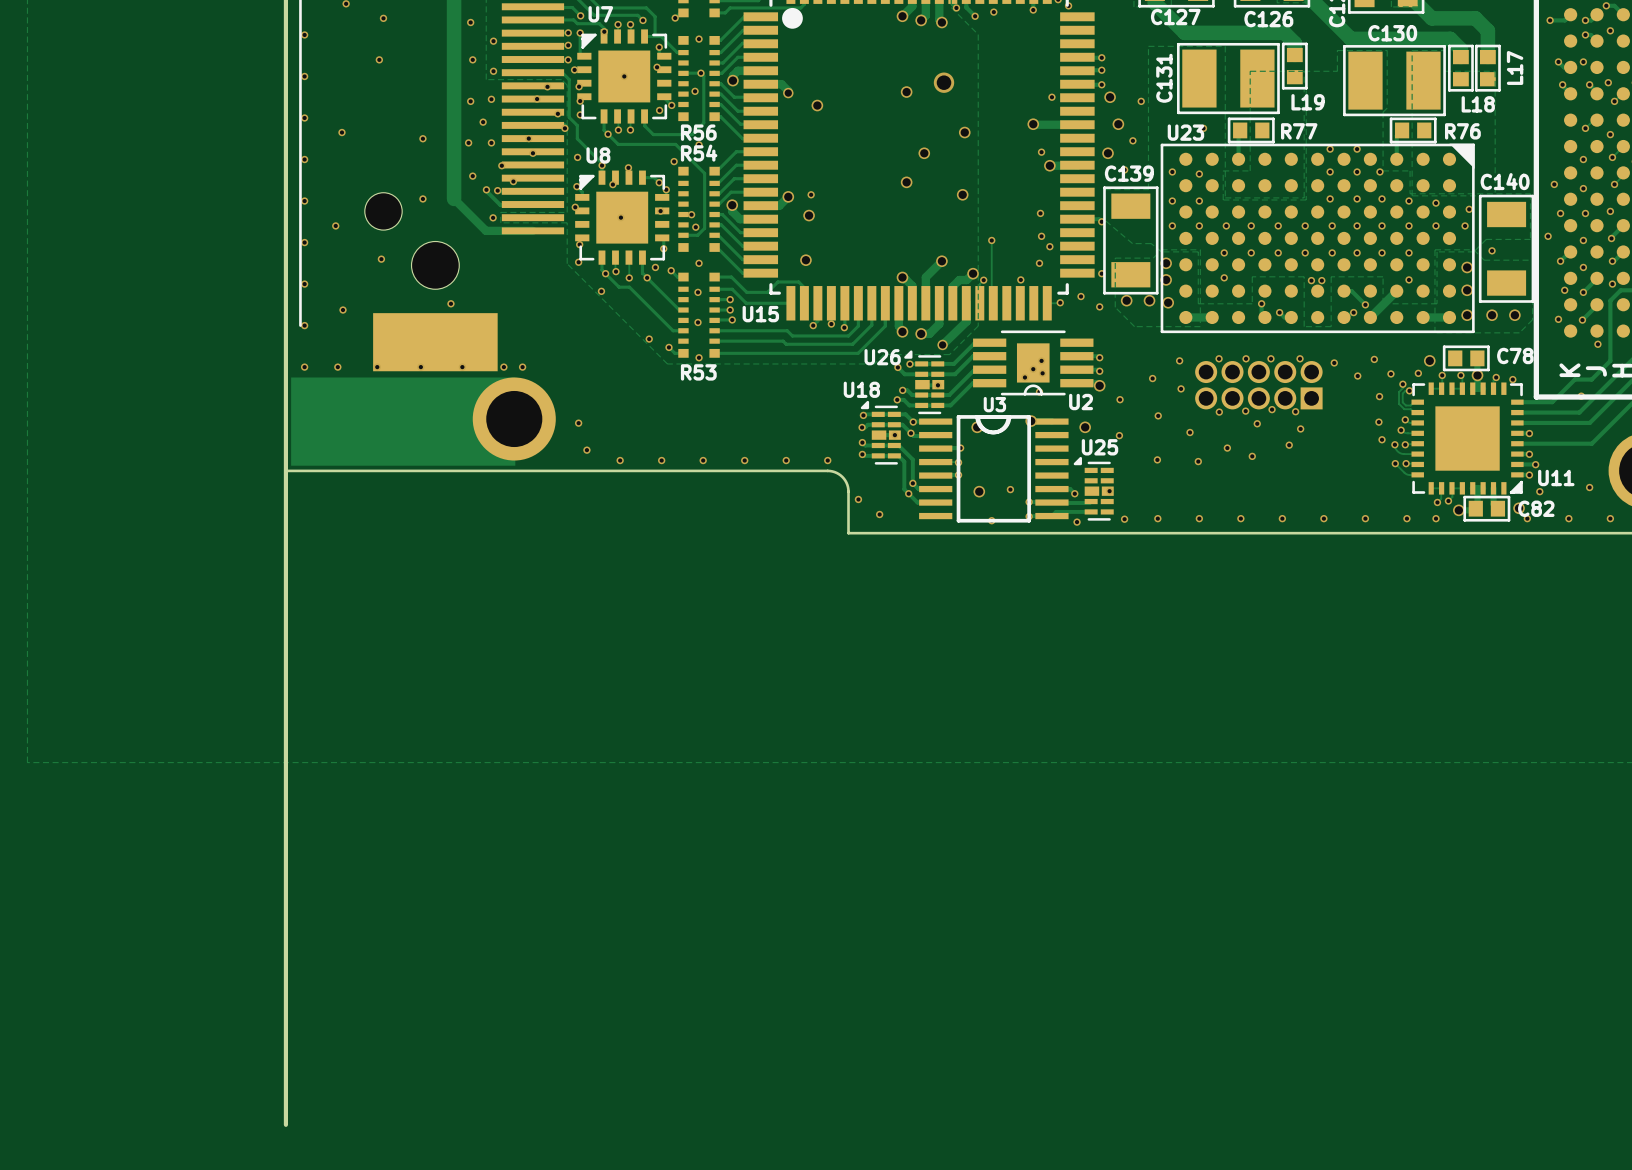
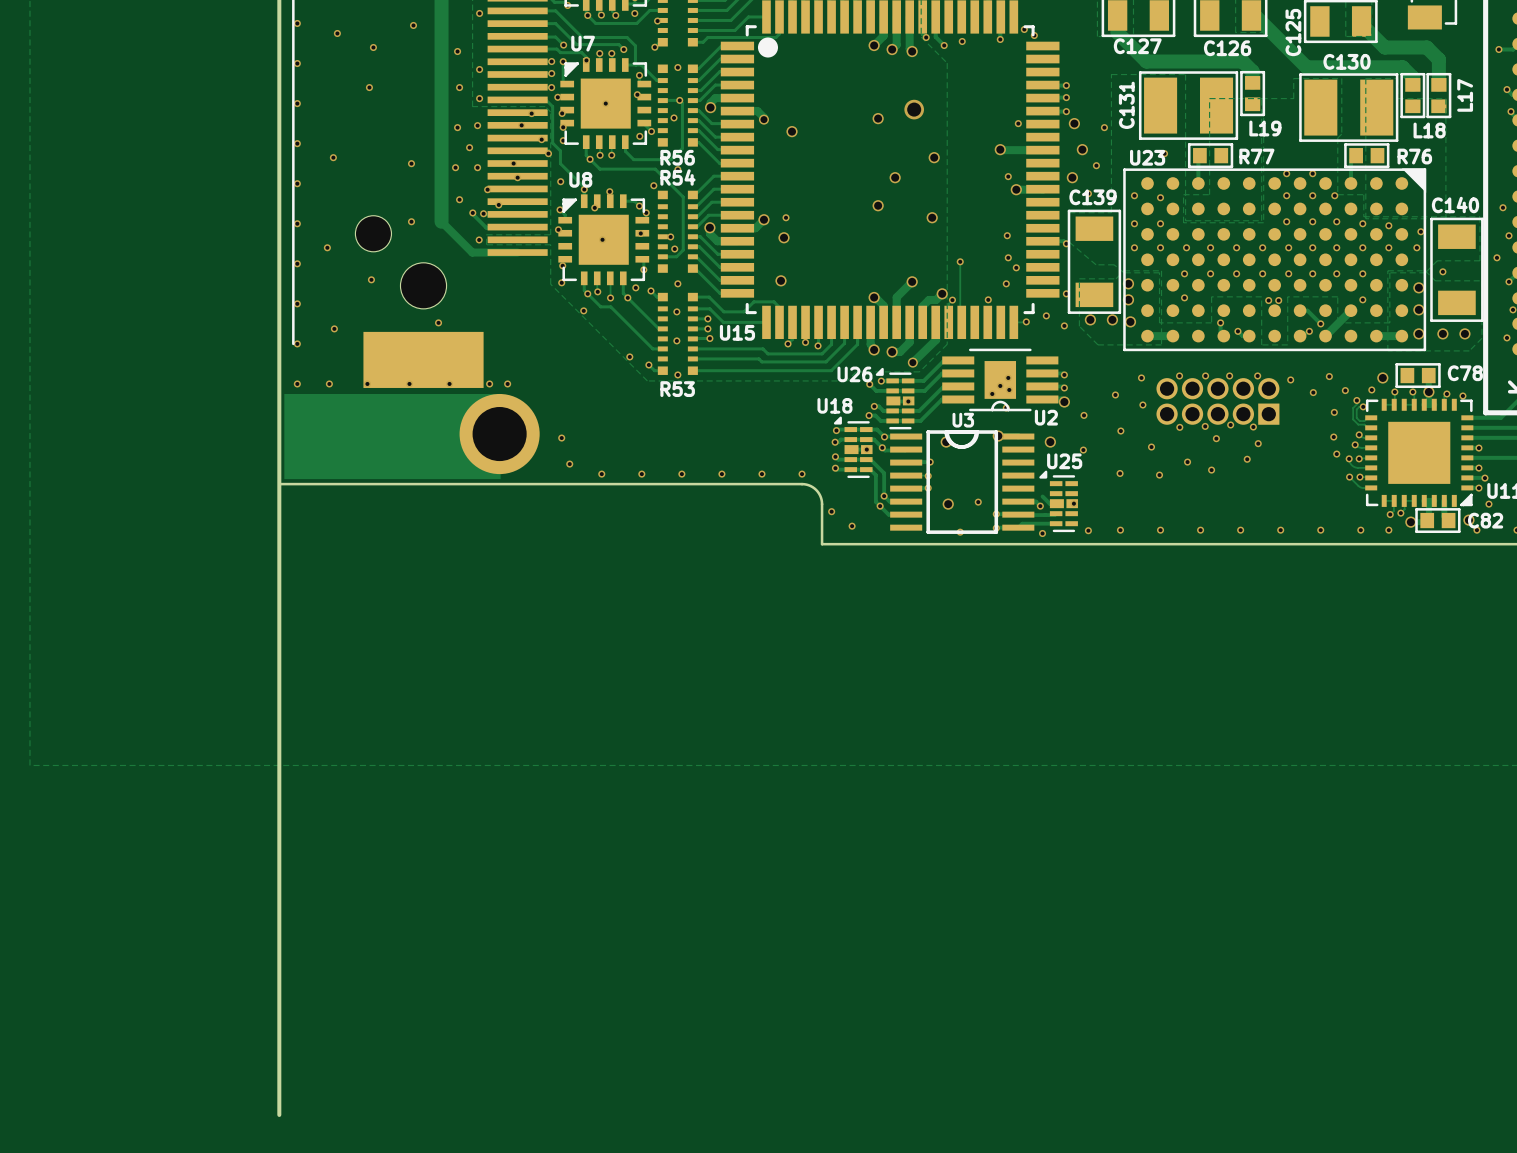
track: none -> (1042, 496) (1049, 503) (1056, 503)

